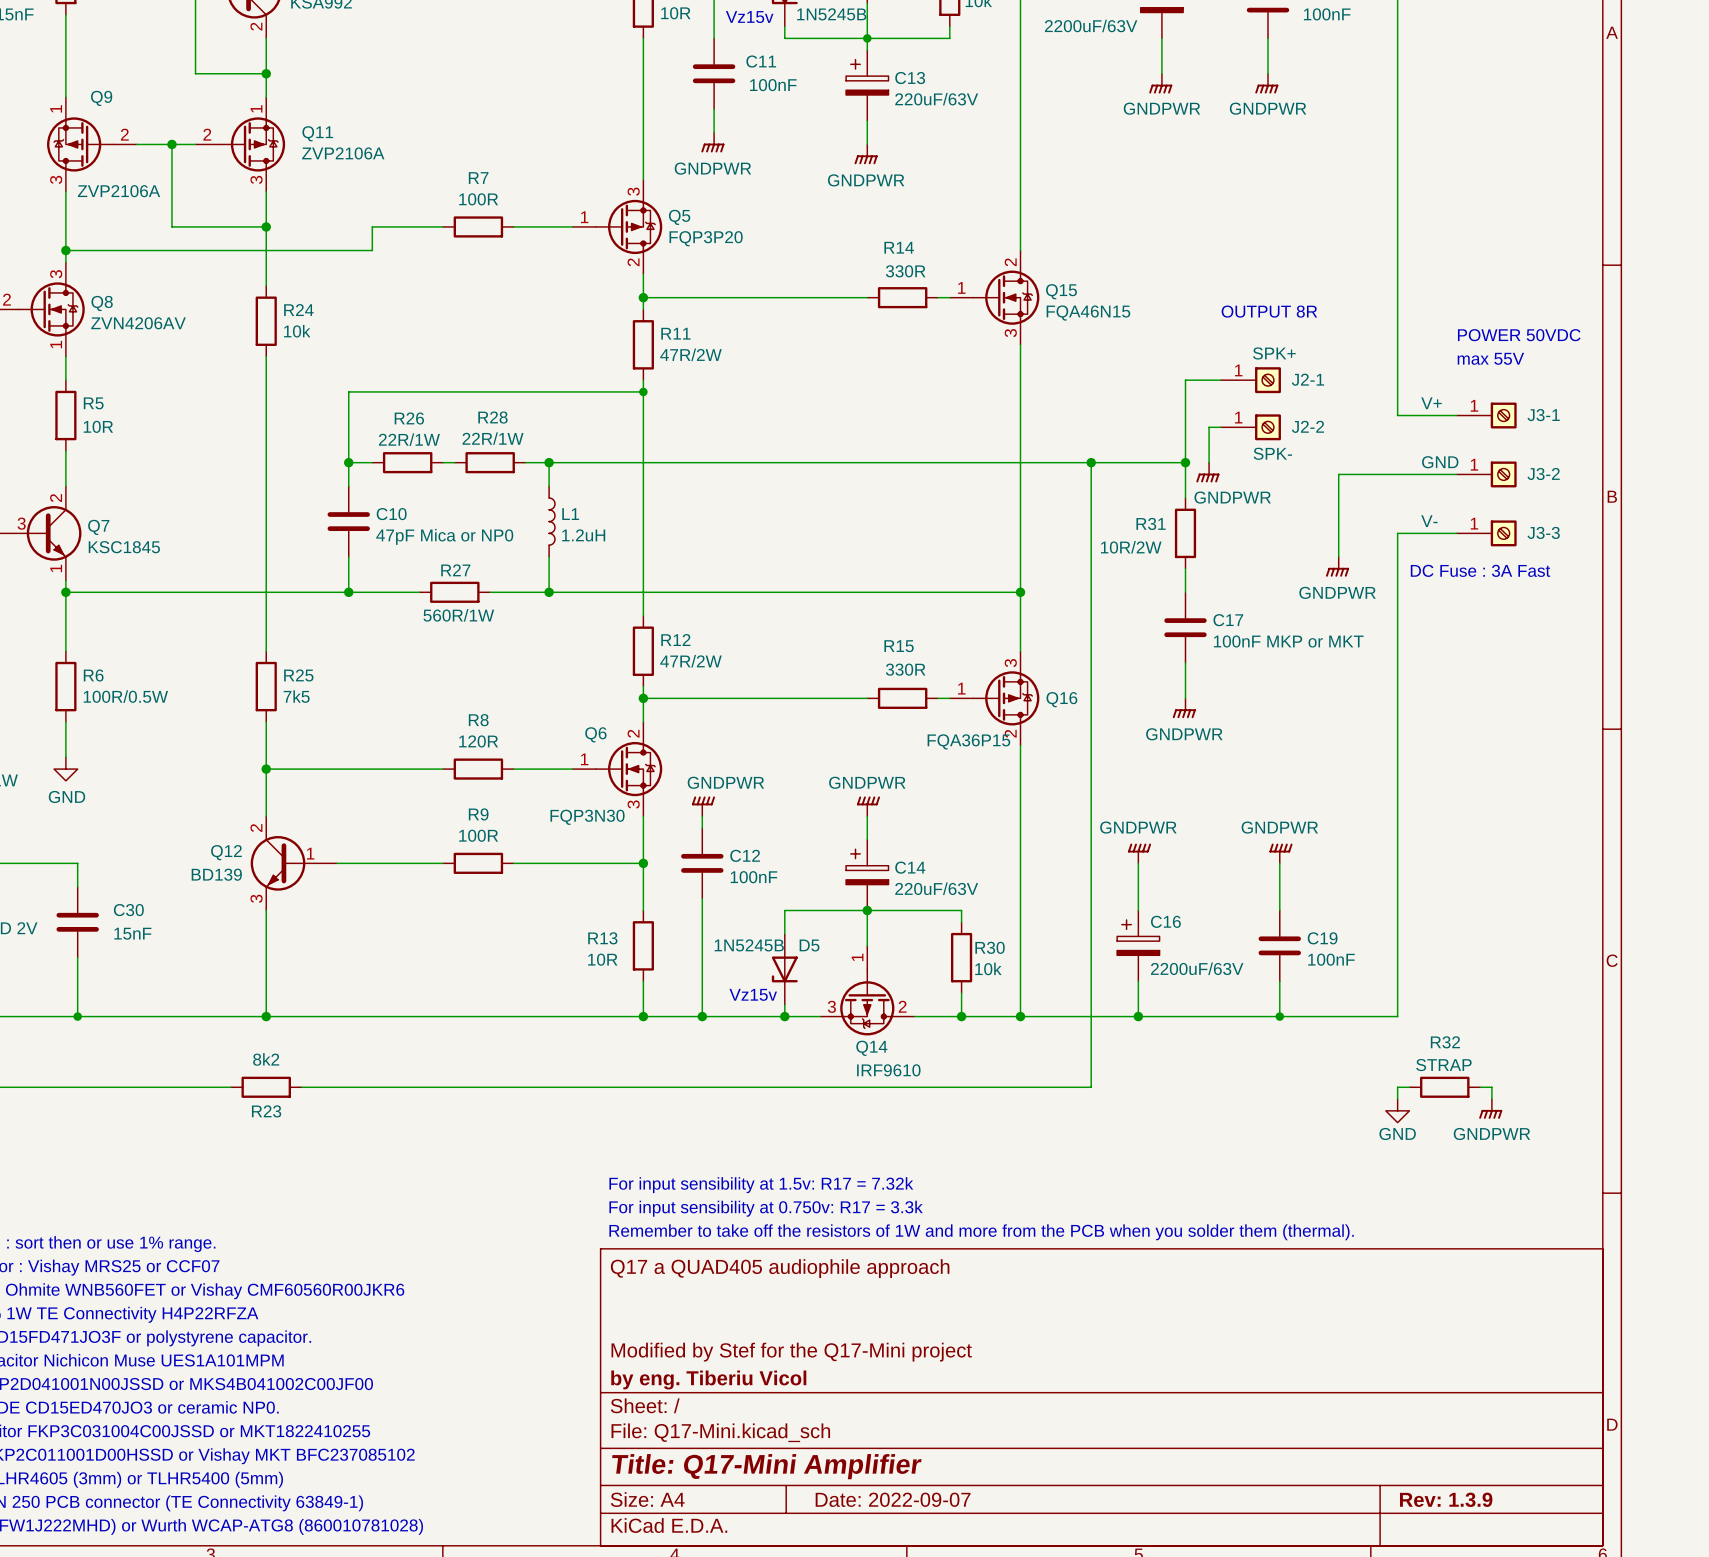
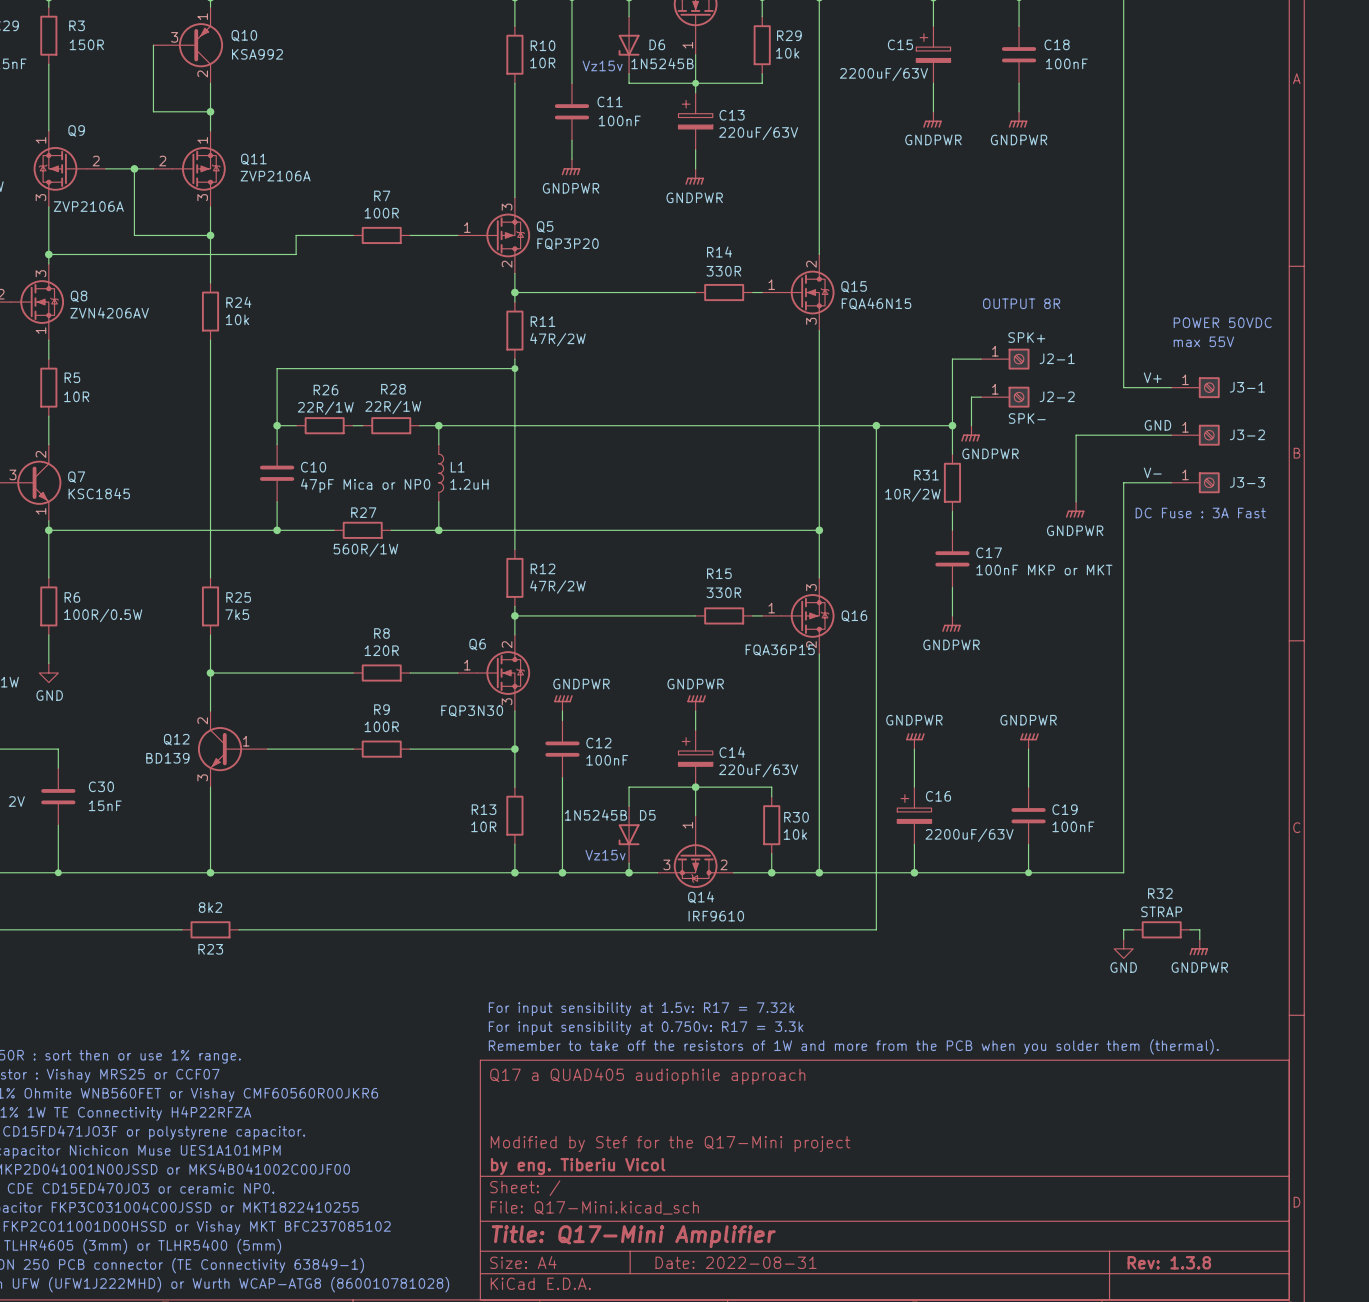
title block: Date: 2022-09-07 (893, 1499) -> Date: 2022-08-31 (736, 1262)
title block: Rev: 1.3.9 (1446, 1499) -> Rev: 1.3.8 (1169, 1262)

